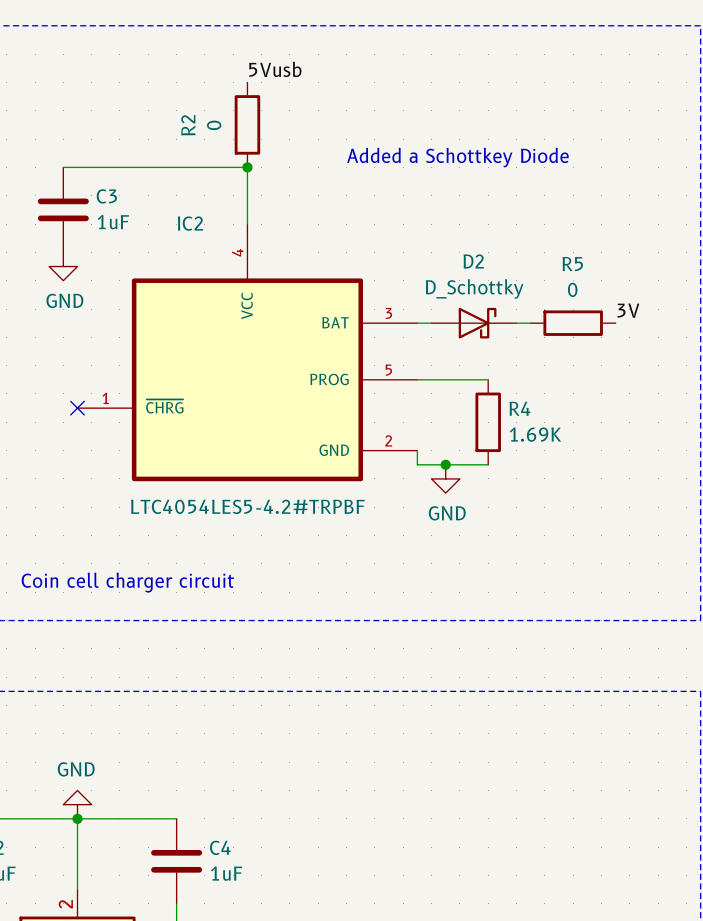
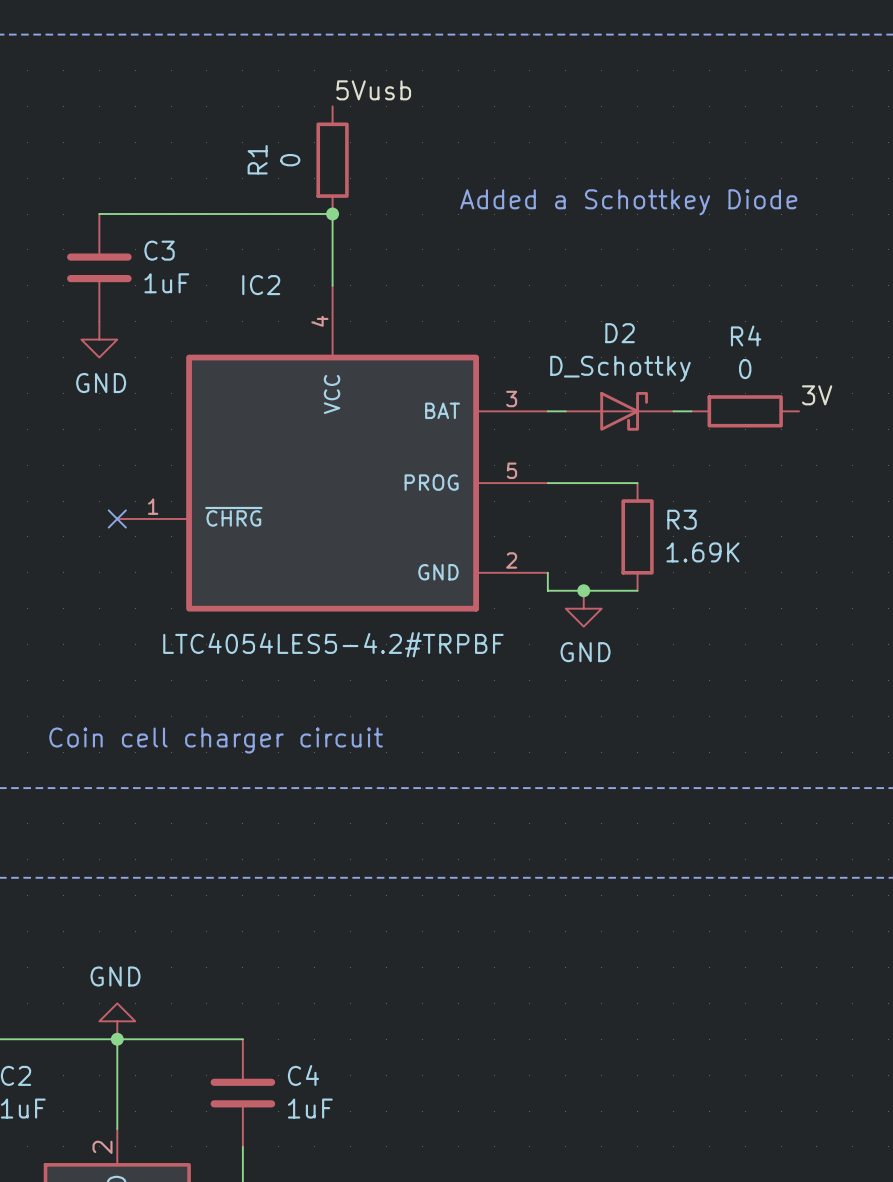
R2 name: R2 (188, 125) -> R1 (257, 159)
R5 name: R5 (572, 264) -> R4 (746, 335)
R4 name: R4 (519, 408) -> R3 (682, 519)

